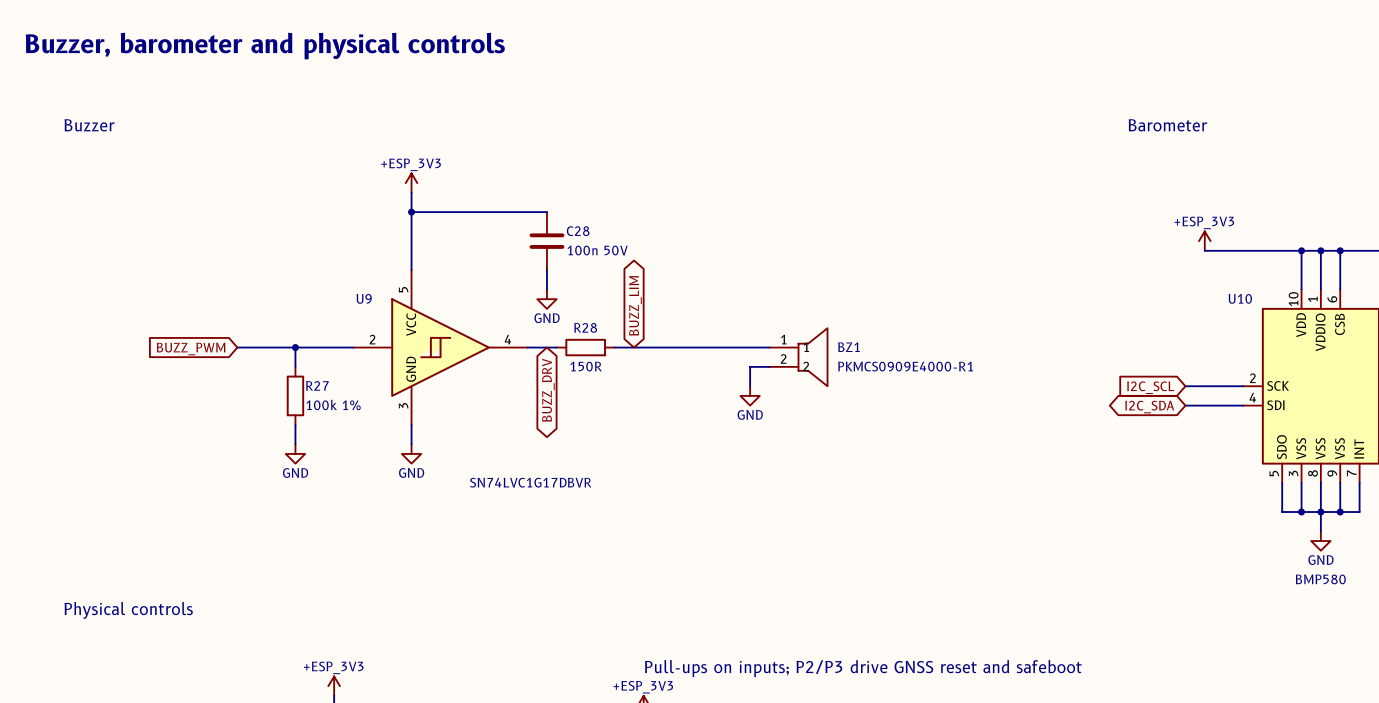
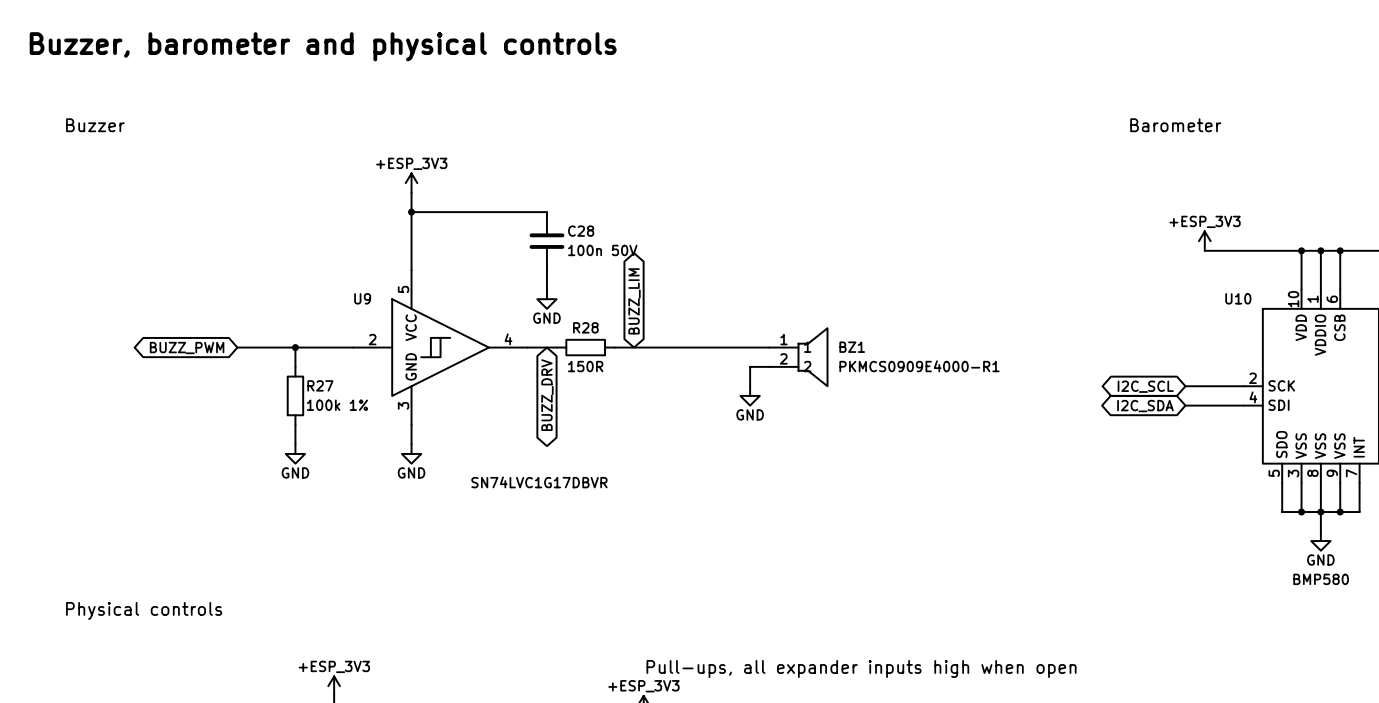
global label shape: input (191, 349) -> bidirectional (187, 348)
global label shape: input (1150, 387) -> bidirectional (1145, 386)
text: Pull-ups on inputs; P2/P3 drive GNSS reset and safeboot (863, 668) -> Pull-ups, all expander inputs high when open (861, 669)

